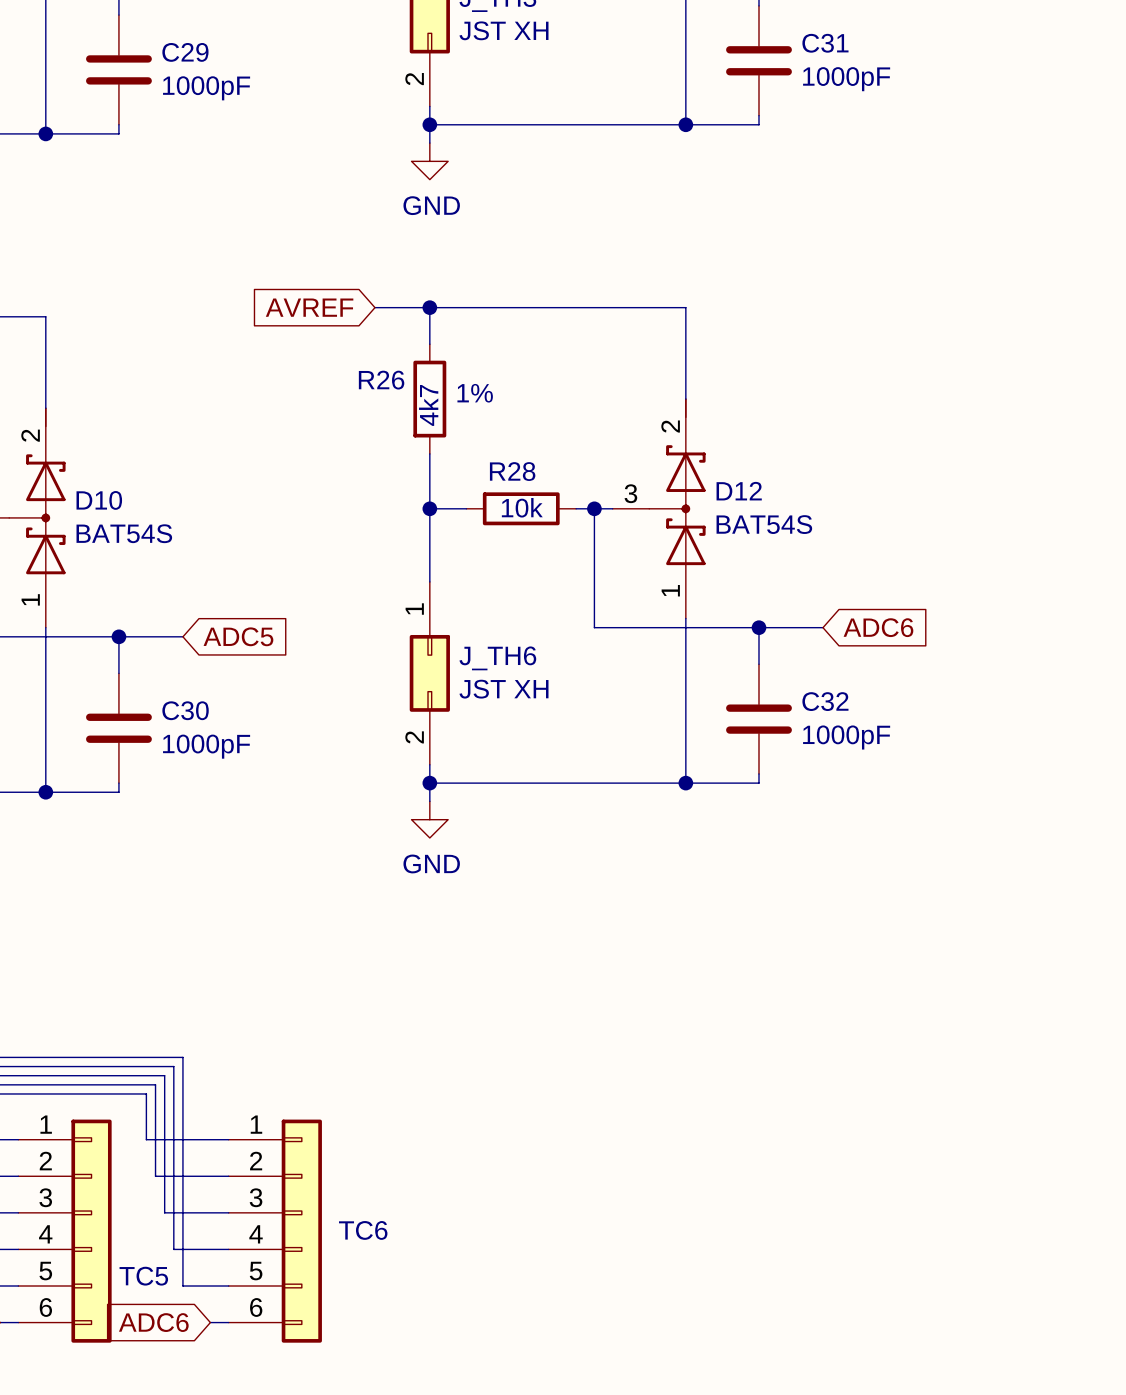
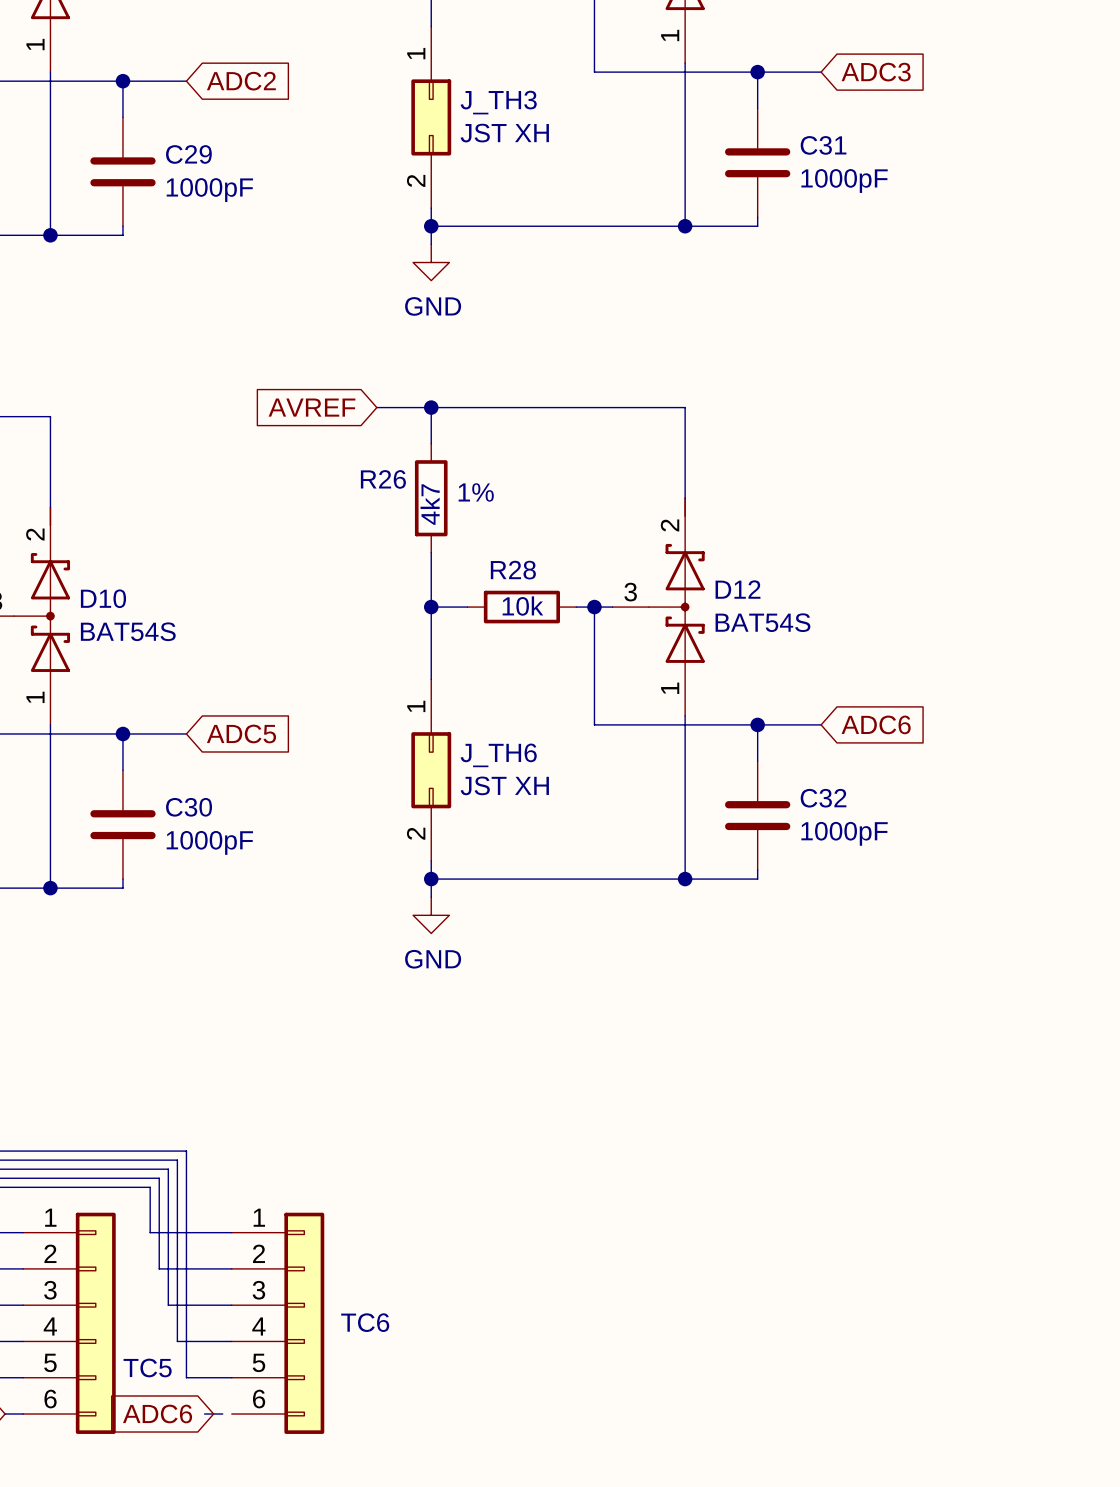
wire: (219, 1322) (228, 1322) -> (204, 1414) (213, 1414)

